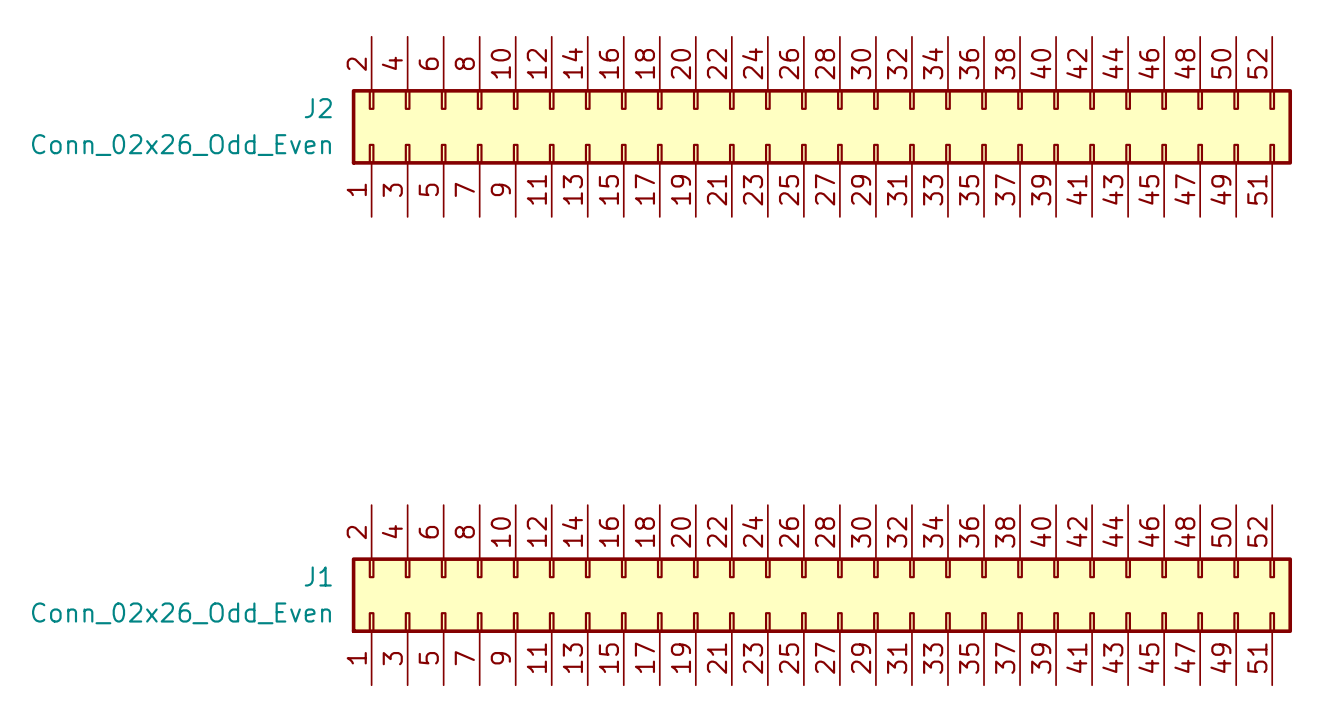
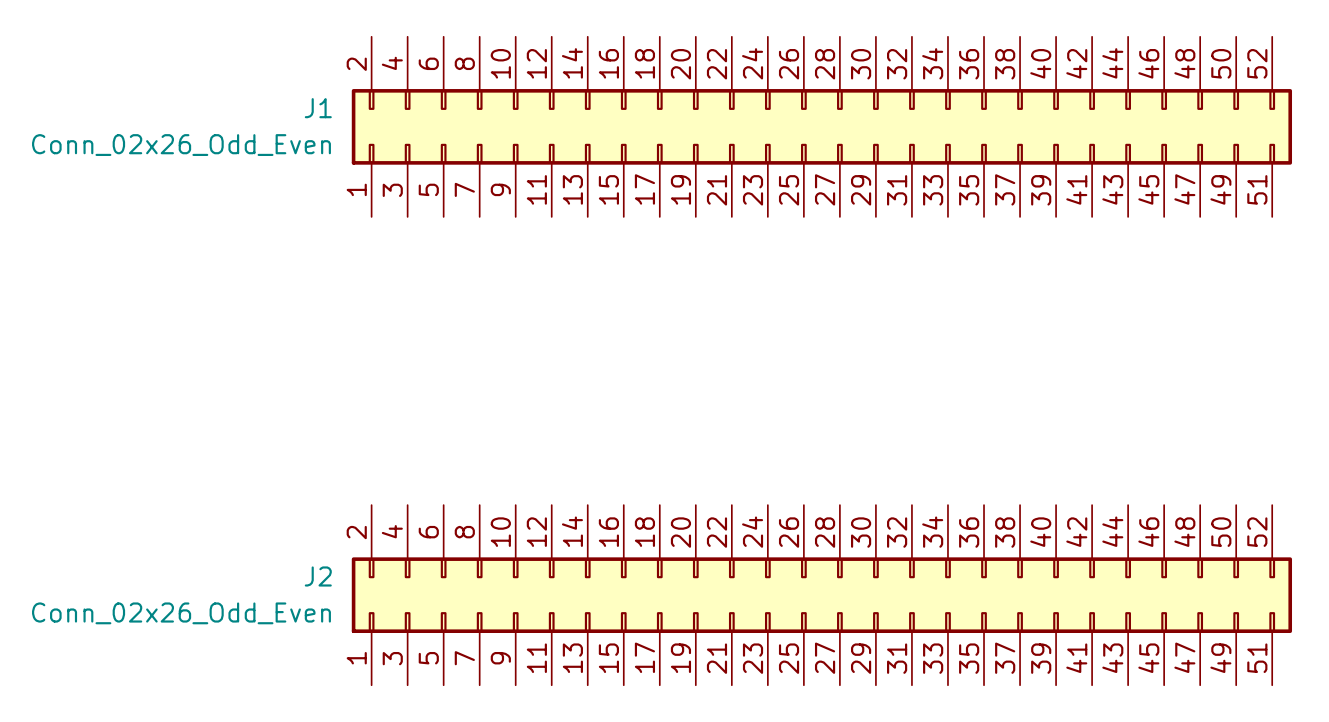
J2 name: J2 (318, 108) -> J1 (318, 108)
J1 name: J1 (318, 576) -> J2 (318, 576)

